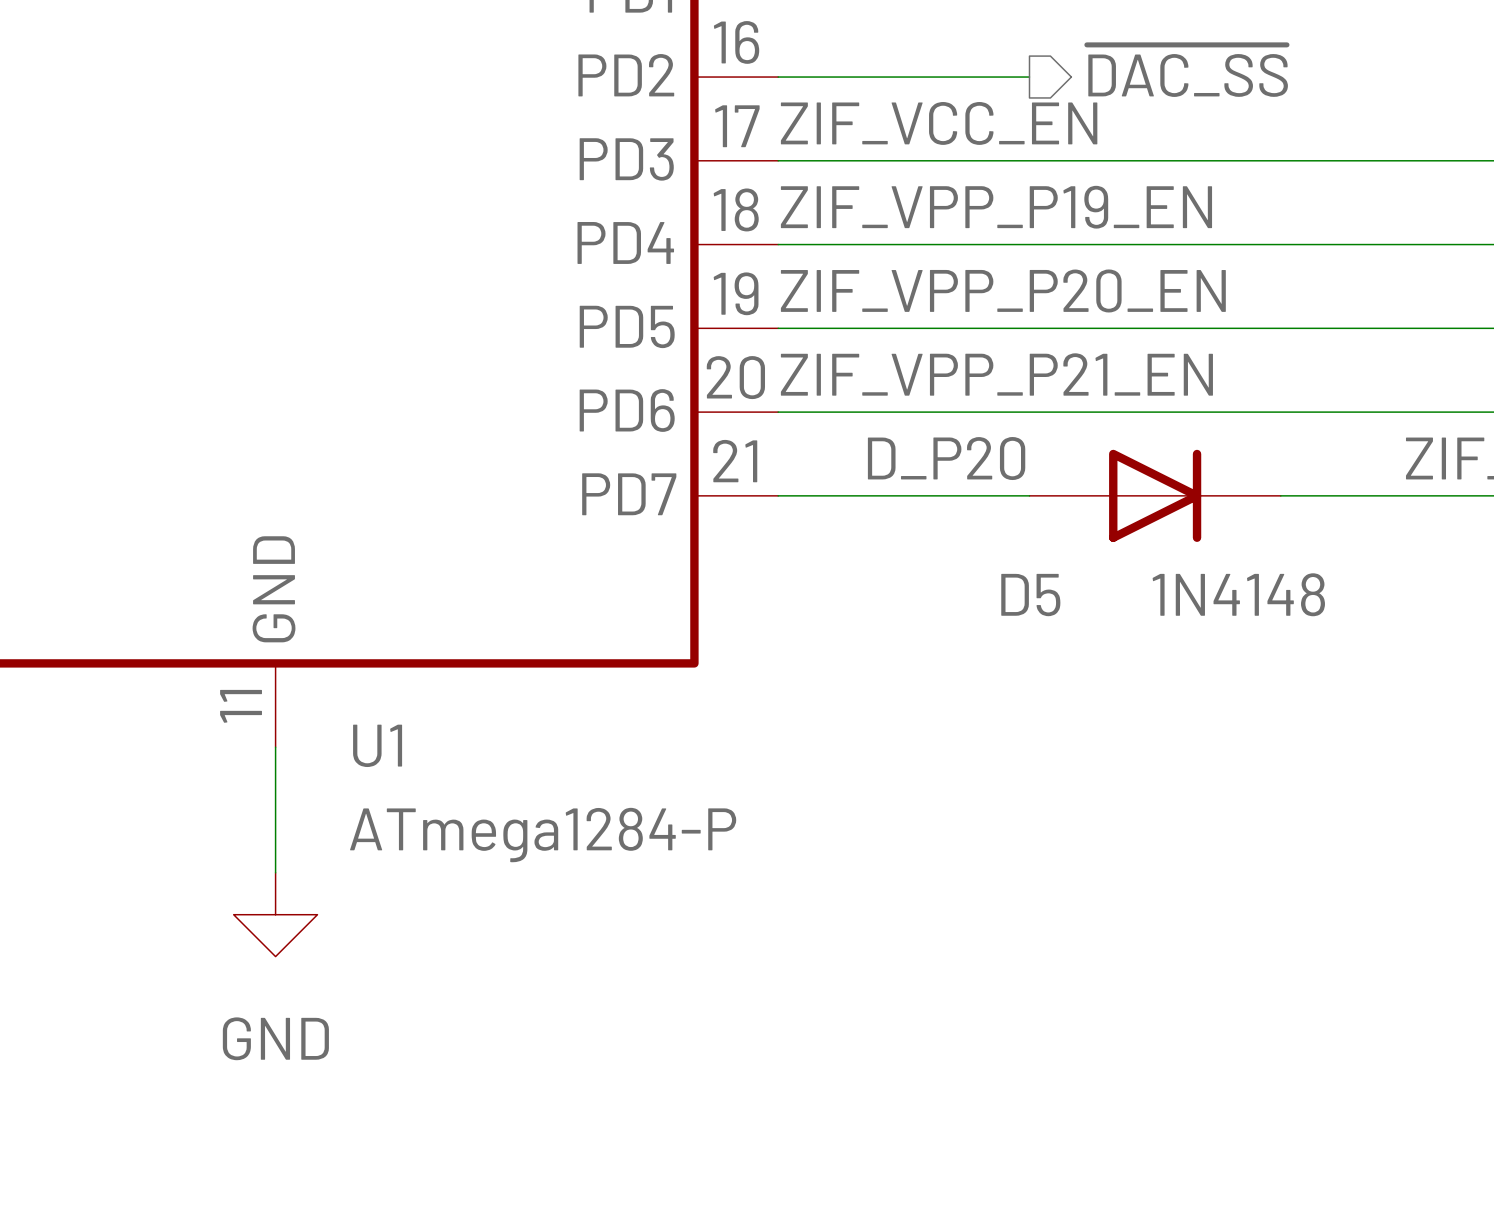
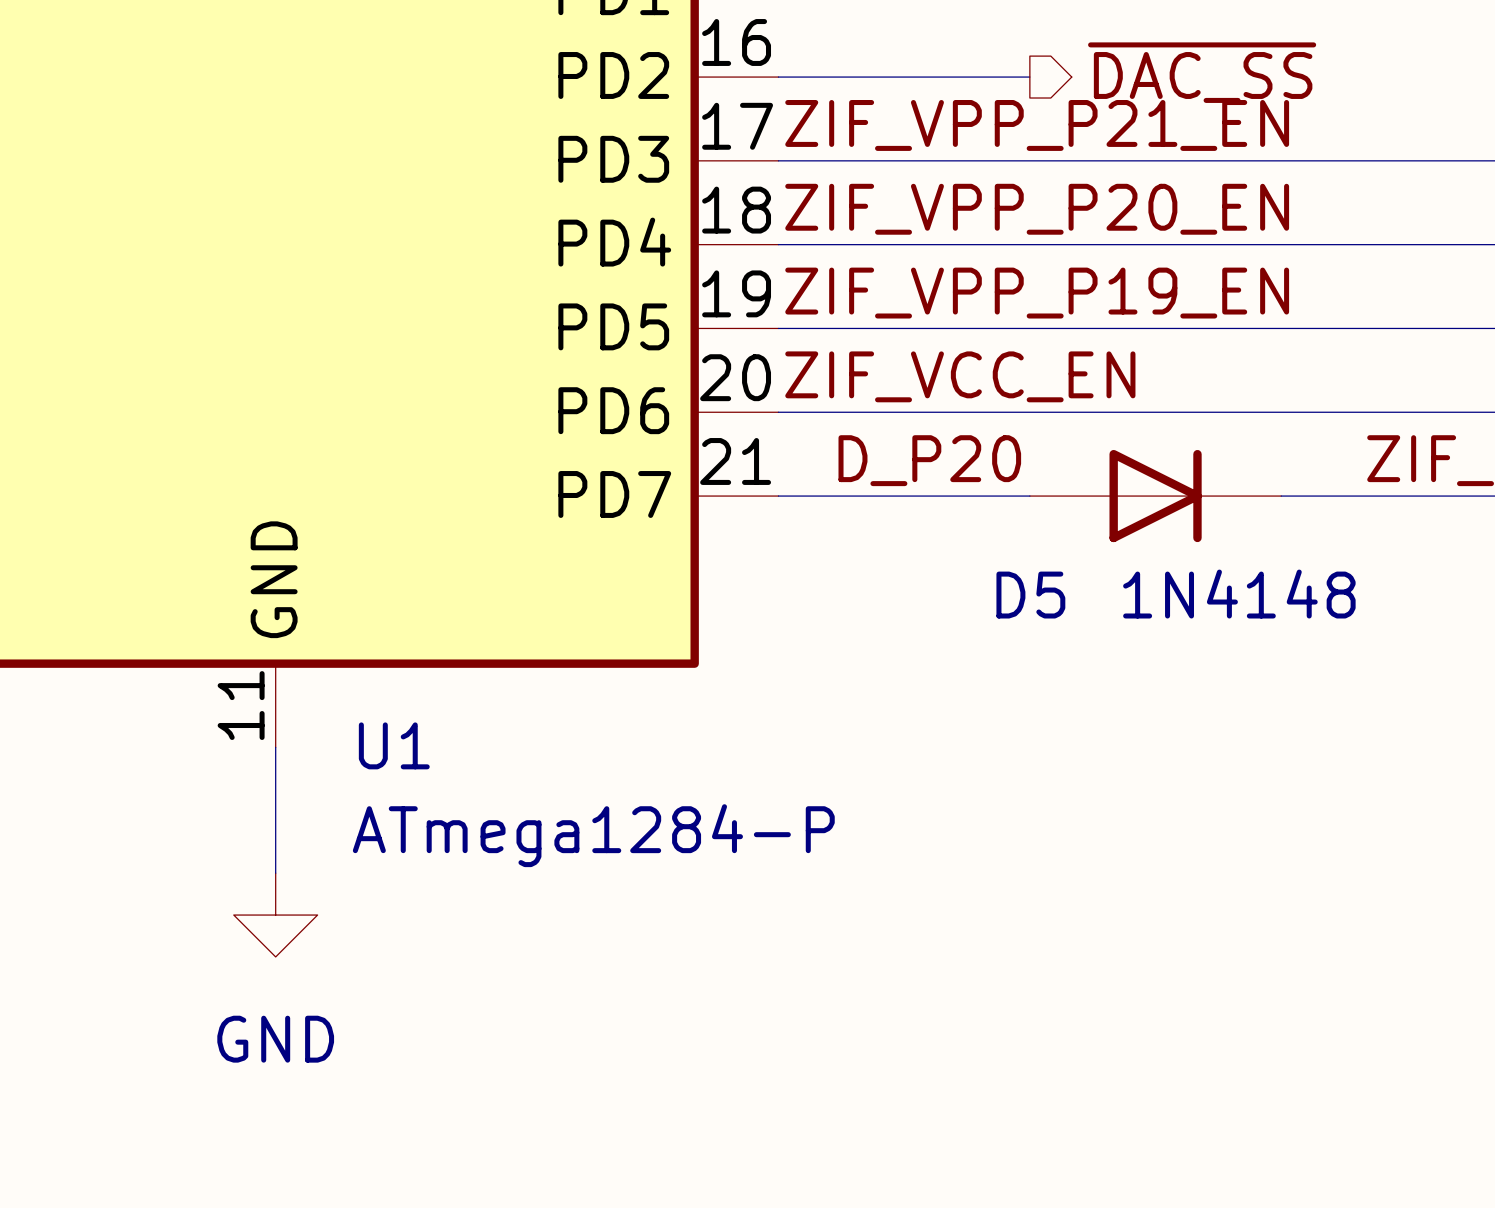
label: ZIF_VCC_EN (939, 123) -> ZIF_VPP_P21_EN (1037, 125)
label: ZIF_VPP_P19_EN (996, 207) -> ZIF_VPP_P20_EN (1037, 209)
label: ZIF_VPP_P20_EN (1003, 290) -> ZIF_VPP_P19_EN (1037, 293)
label: ZIF_VPP_P21_EN (996, 374) -> ZIF_VCC_EN (960, 376)

